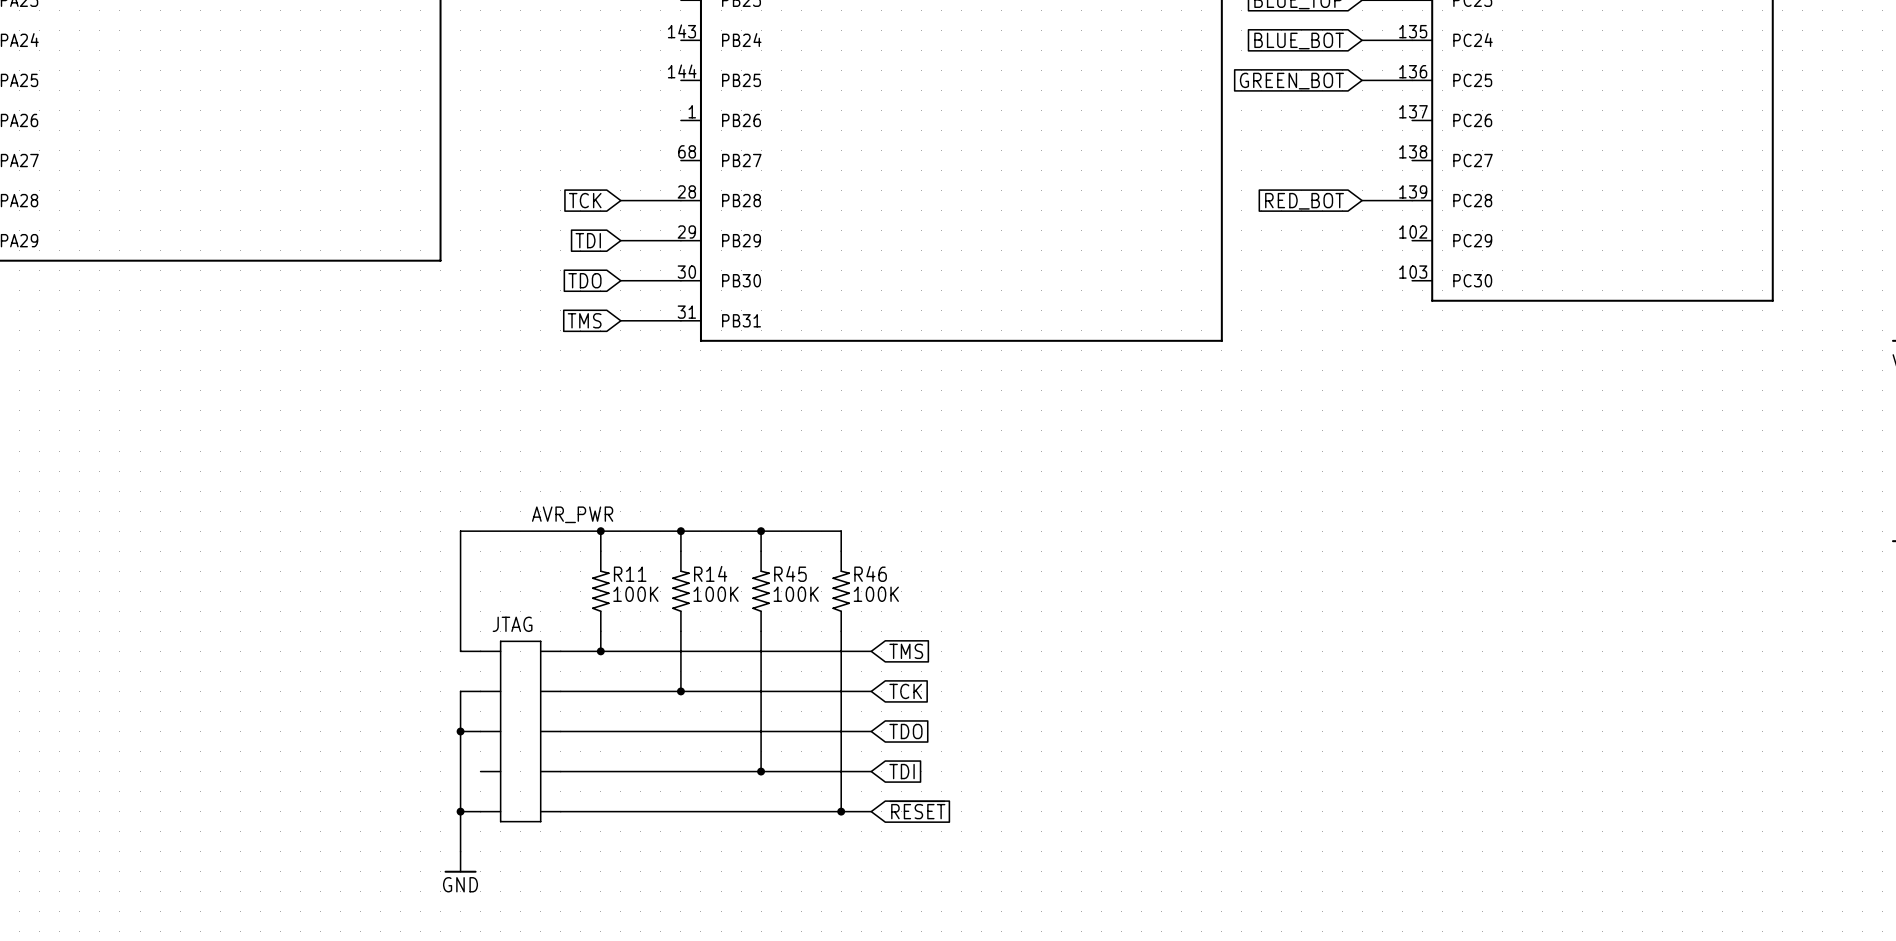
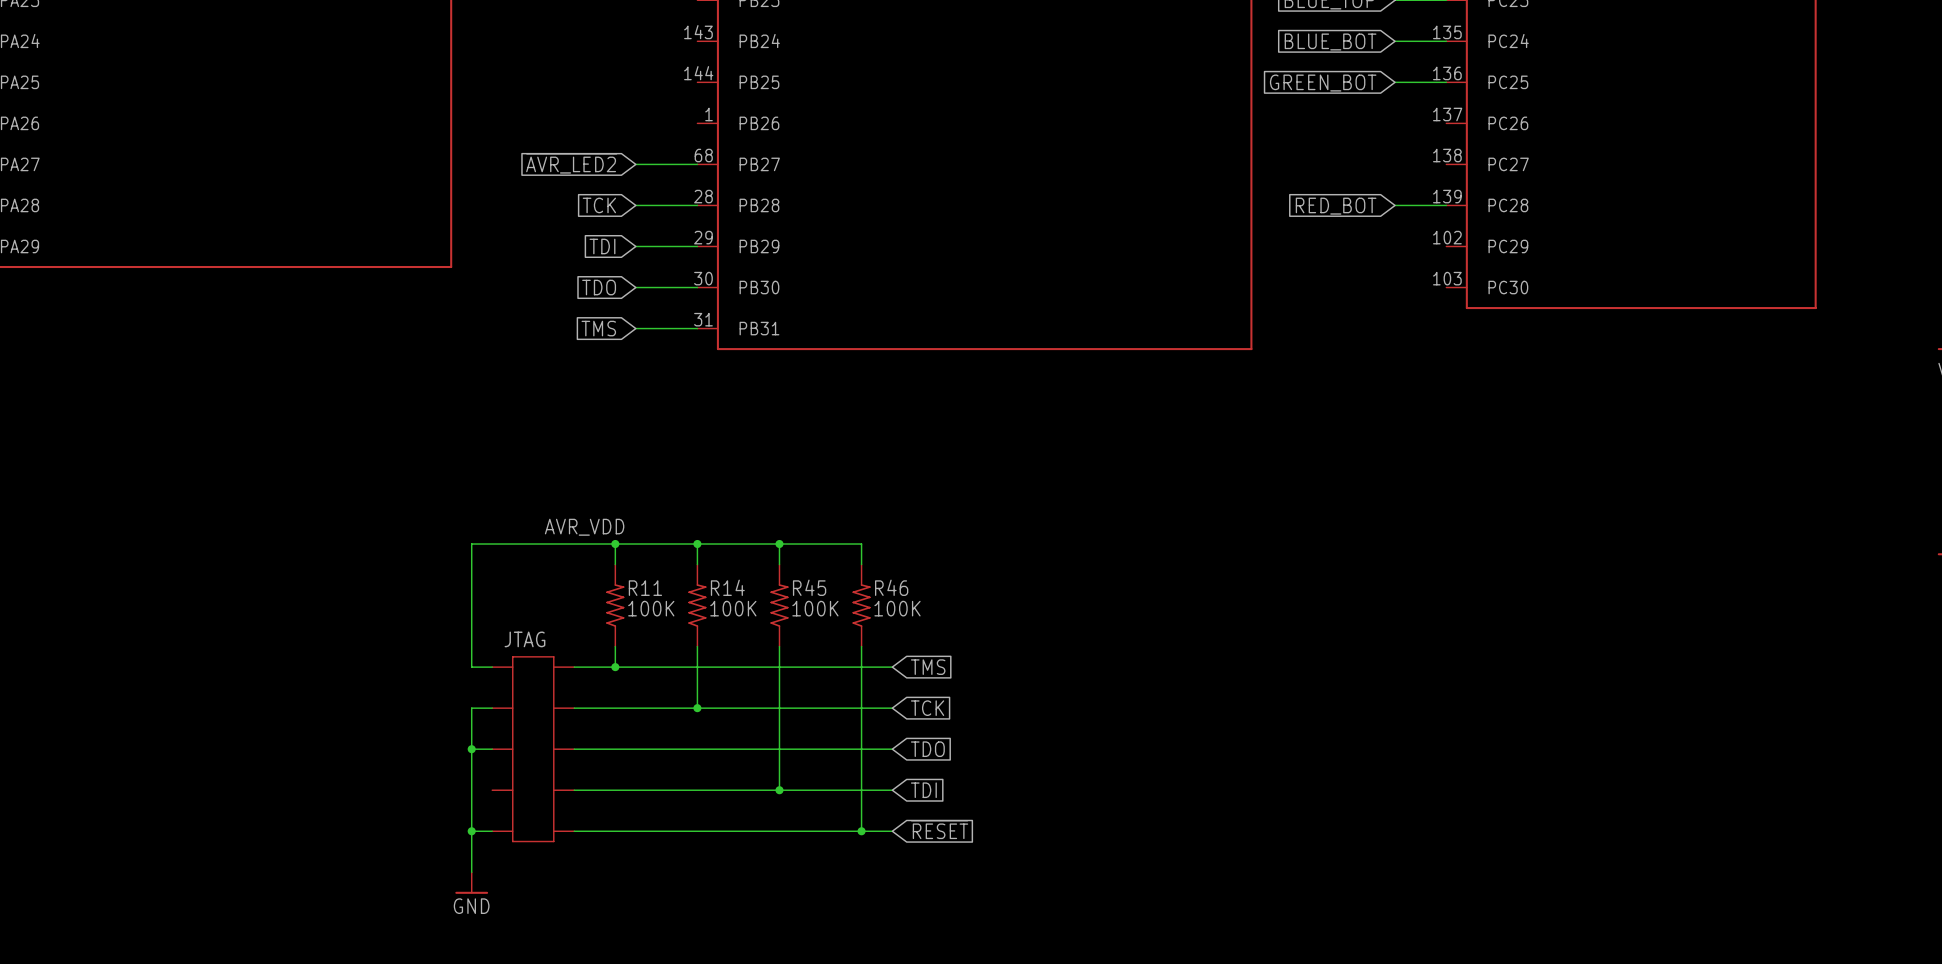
global label: none -> ~{AVR_LED2} (571, 163)
wire: none -> (635, 164) (697, 164)
label: AVR_PWR (572, 514) -> AVR_VDD (584, 527)

